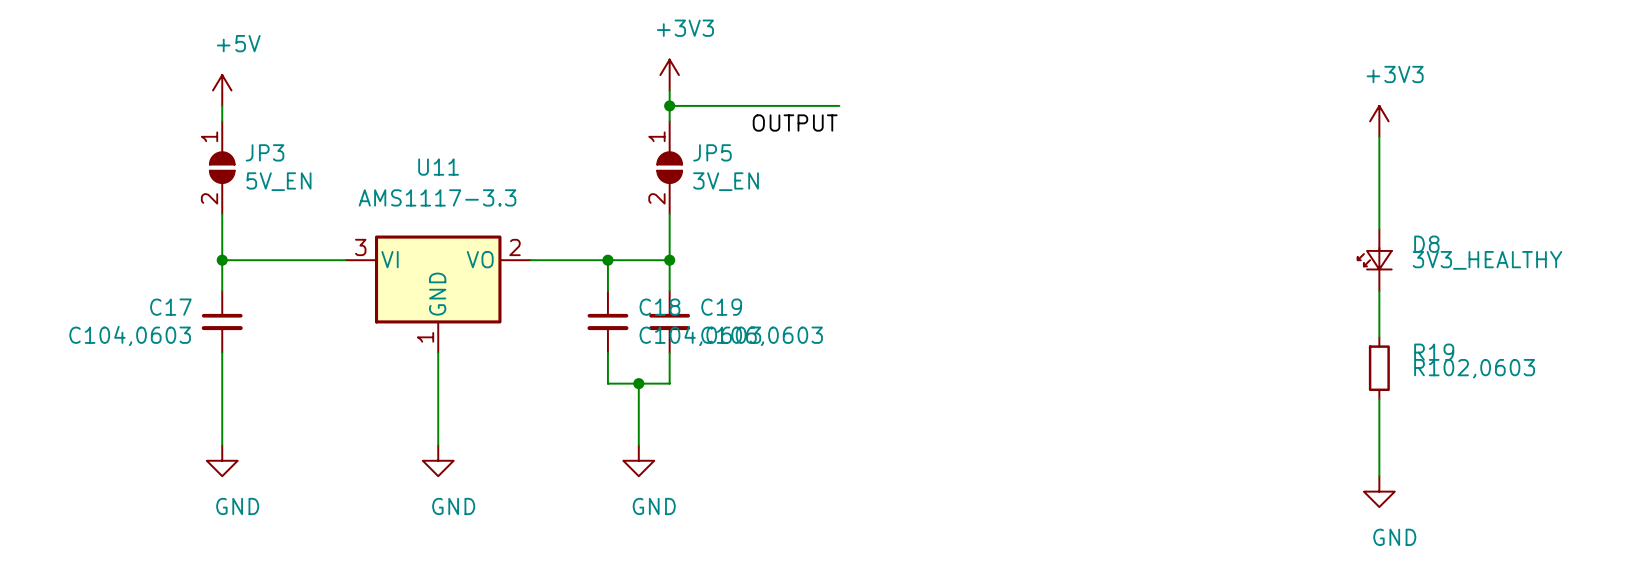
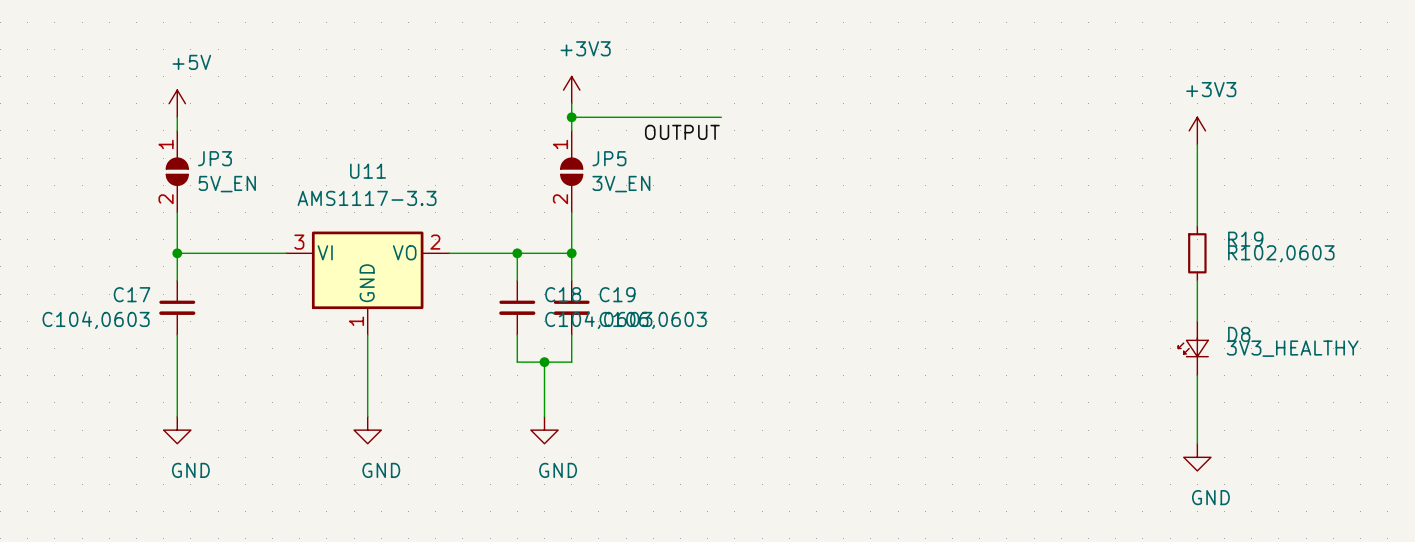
D8 position: (1374, 260) -> (1193, 348)
R19 position: (1379, 368) -> (1197, 253)

